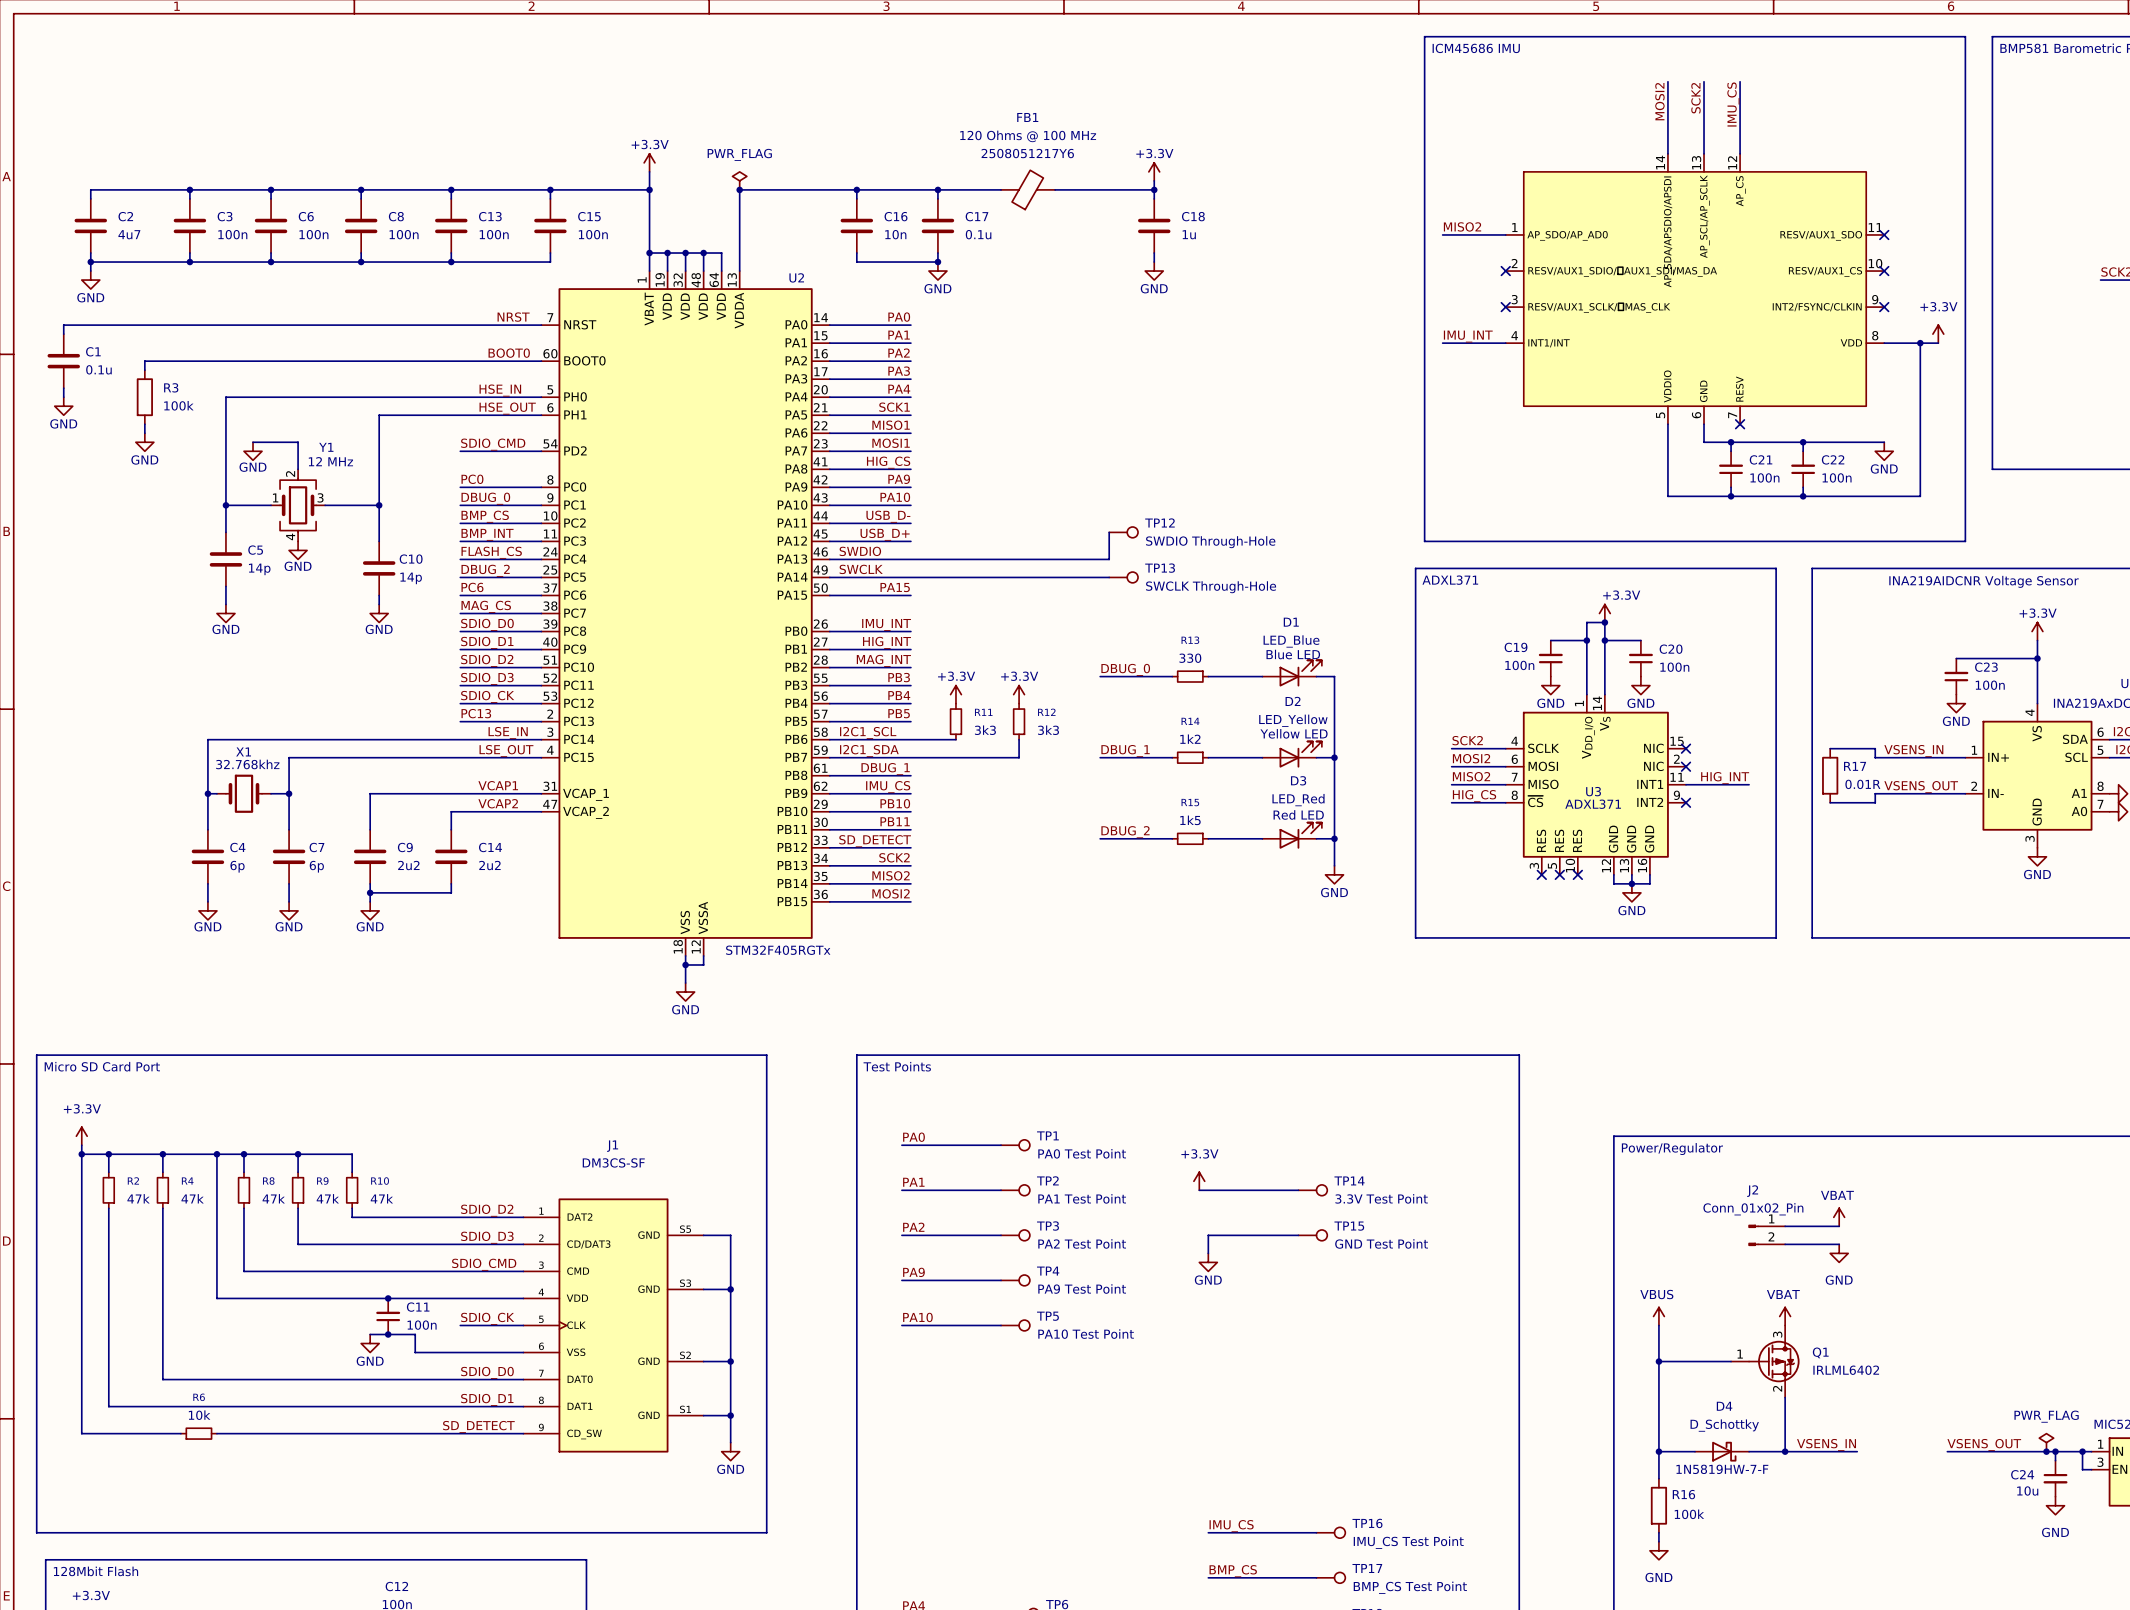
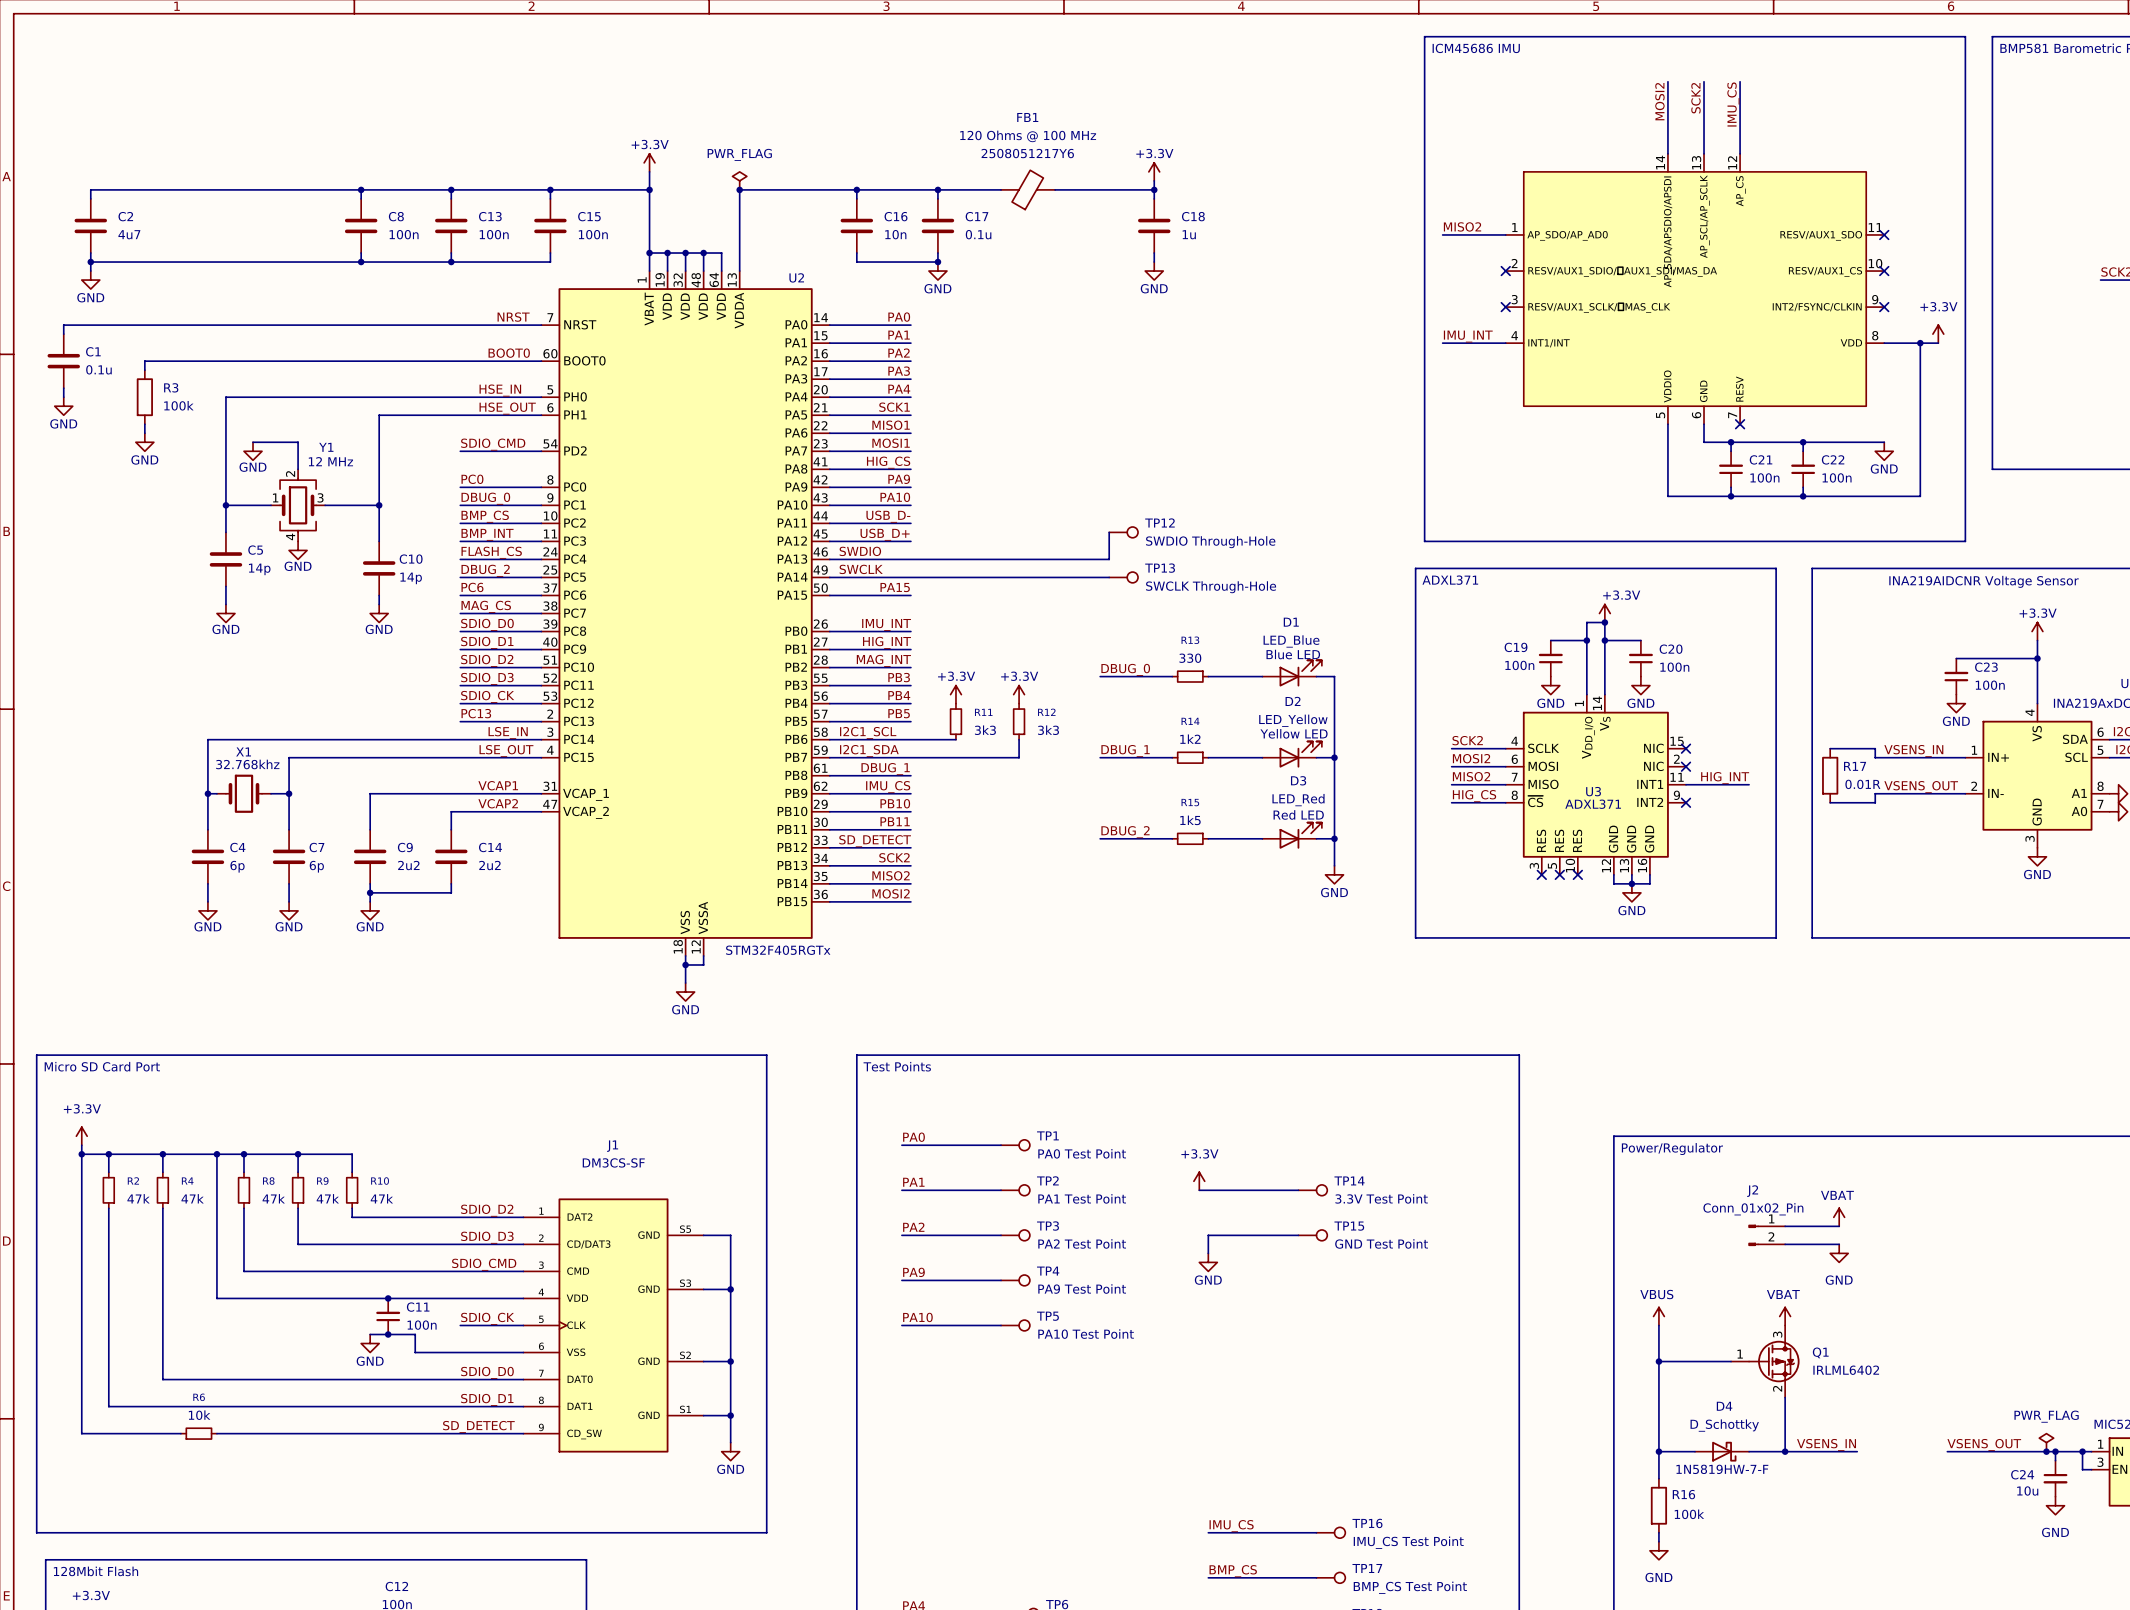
wire: (189, 189) (189, 198) -> none
junction: (189, 189) -> none
wire: (271, 189) (271, 198) -> none
junction: (271, 189) -> none
C3: 100n (189, 225) -> none
C6: 100n (271, 225) -> none
wire: (189, 253) (189, 262) -> none
wire: (271, 253) (271, 262) -> none
junction: (189, 262) -> none
junction: (271, 262) -> none

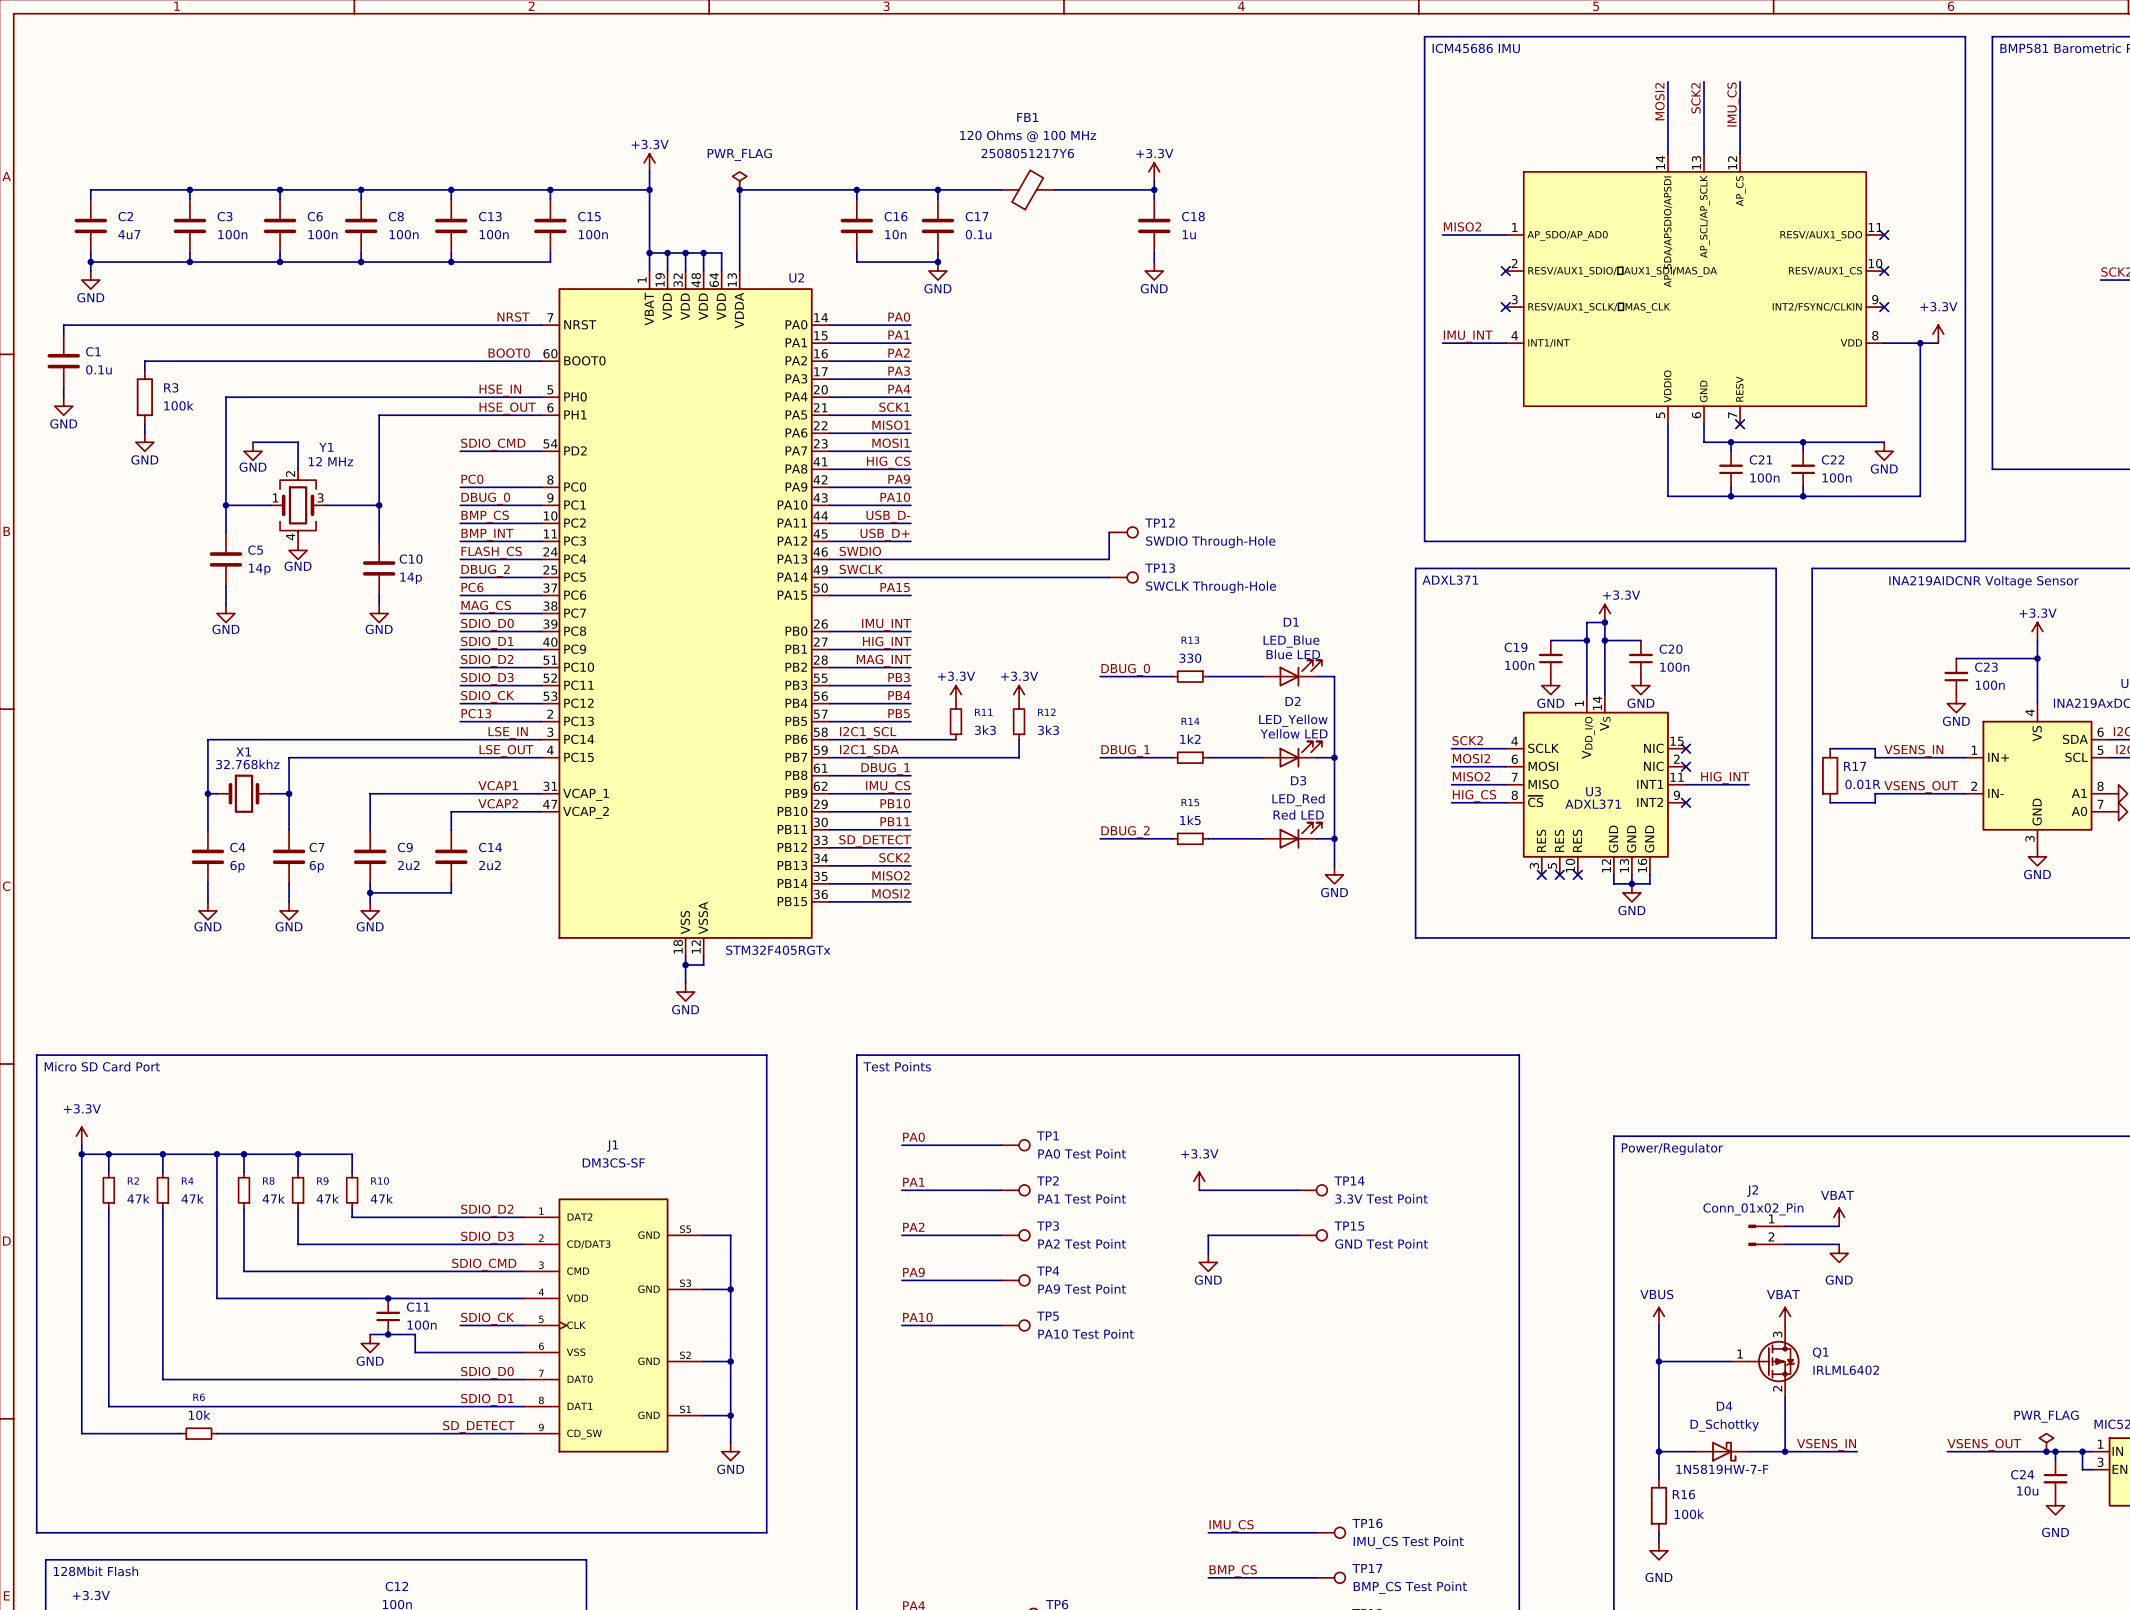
wire: none -> (189, 189) (189, 198)
junction: none -> (189, 189)
wire: none -> (280, 189) (280, 198)
junction: none -> (280, 189)
C3: none -> 100n (189, 225)
C6: none -> 100n (280, 225)
wire: none -> (189, 253) (189, 262)
wire: none -> (280, 253) (280, 262)
junction: none -> (189, 262)
junction: none -> (280, 262)

